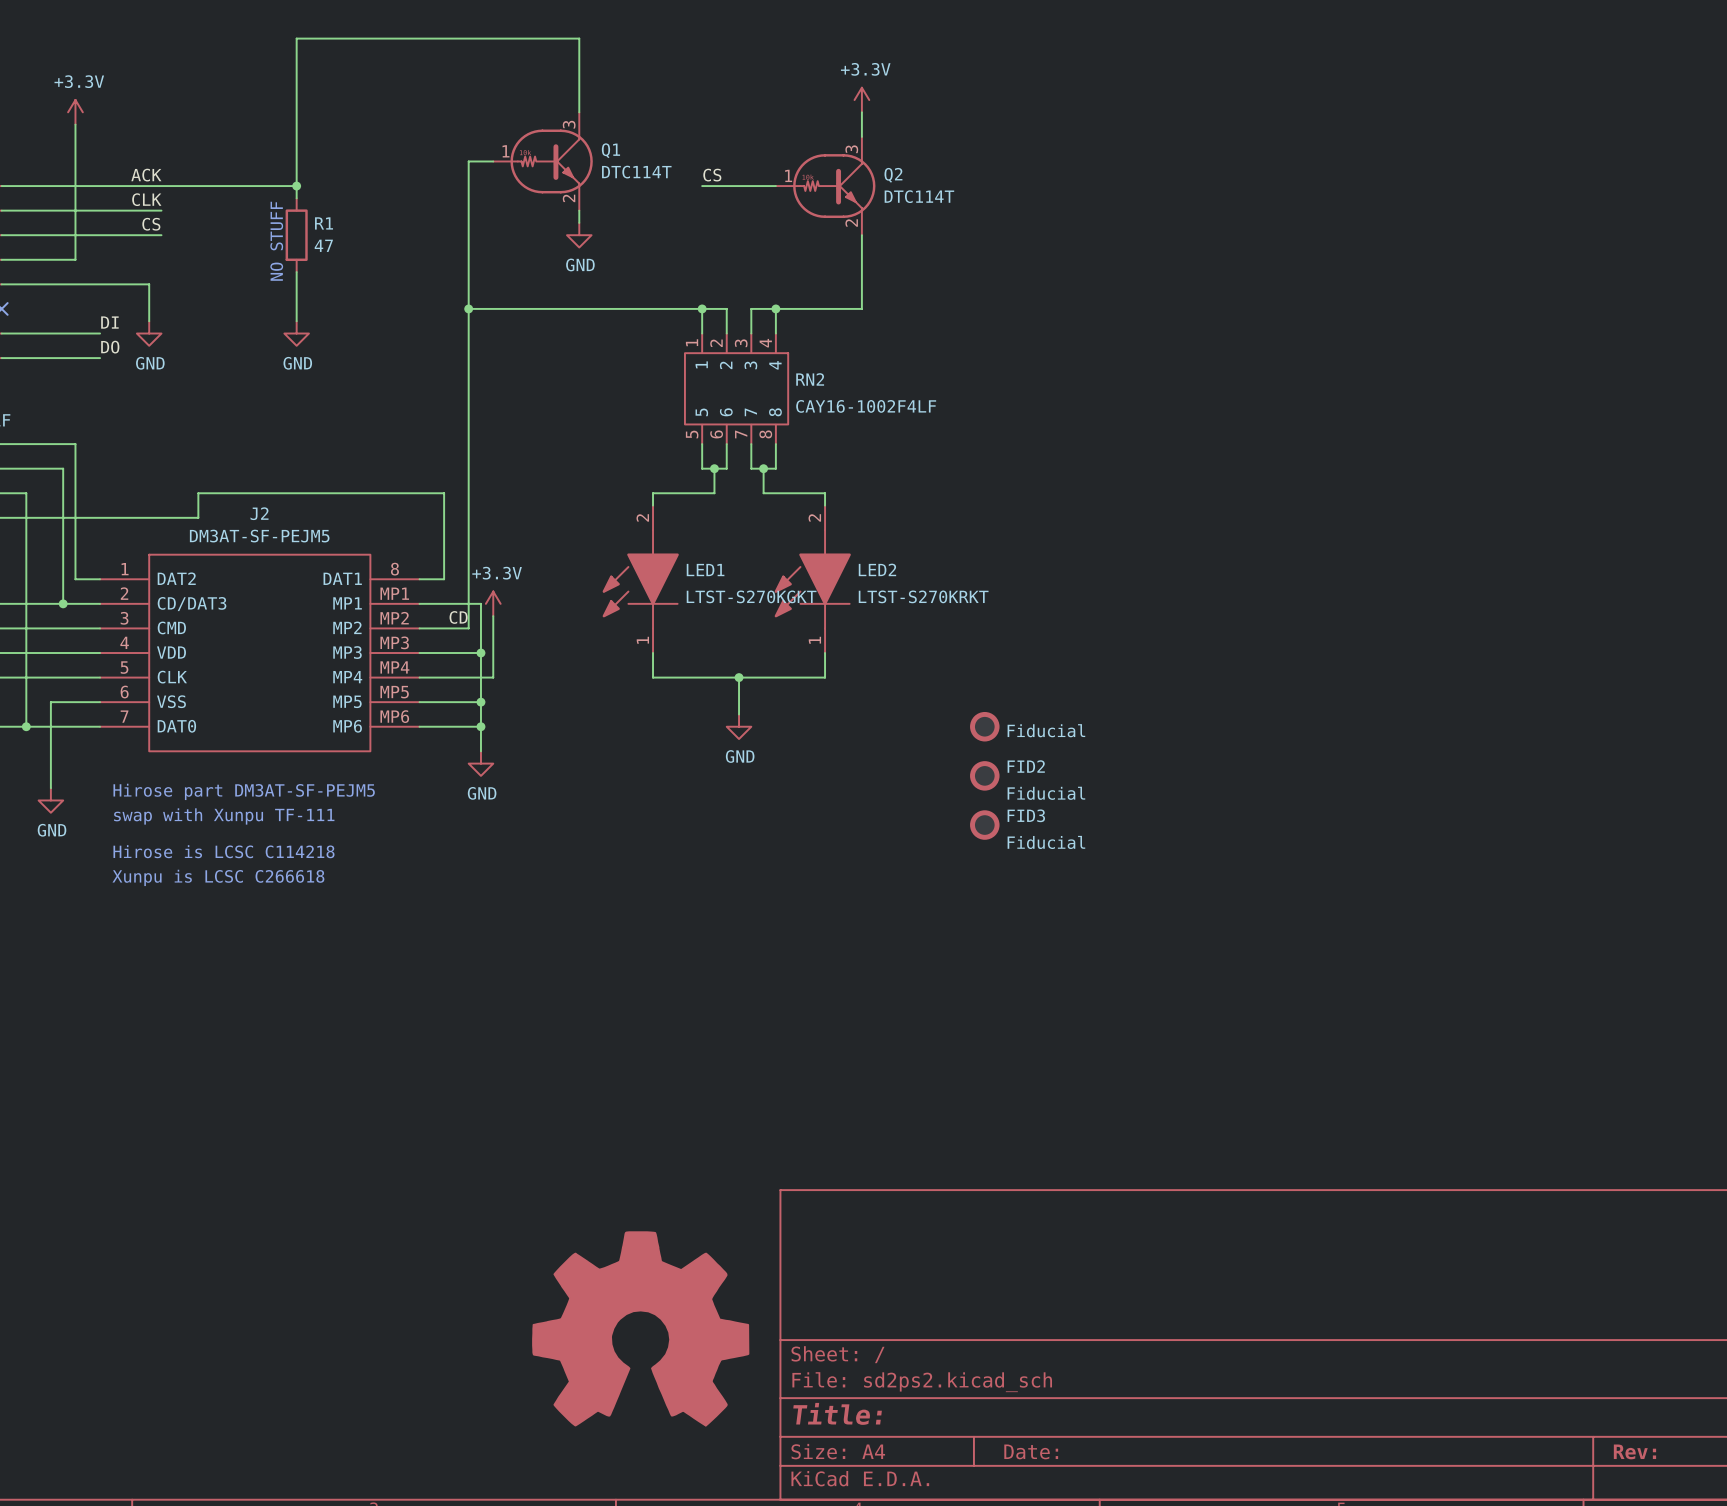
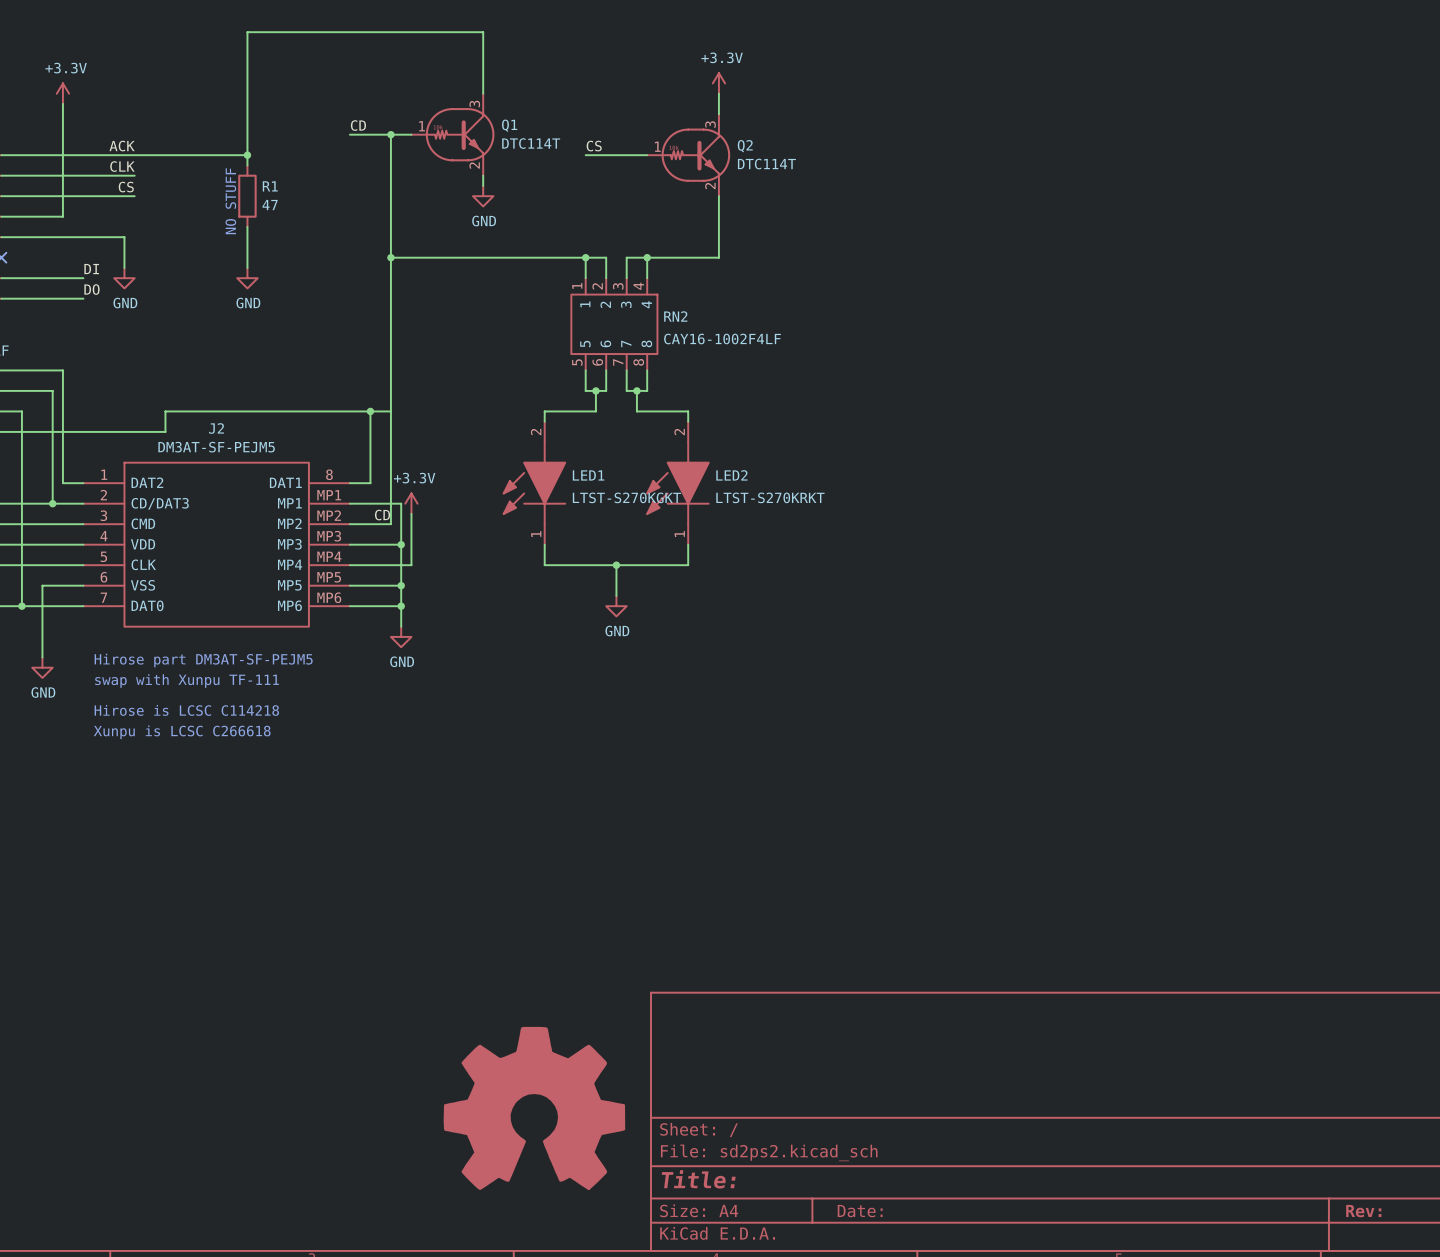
label: none -> CD (358, 125)
wire: none -> (349, 134) (390, 134)
junction: none -> (390, 134)
wire: none -> (370, 411) (390, 411)
junction: none -> (370, 411)
part: Fiducial (984, 726) -> none
FID2: Fiducial (984, 775) -> none
FID3: Fiducial (984, 825) -> none

